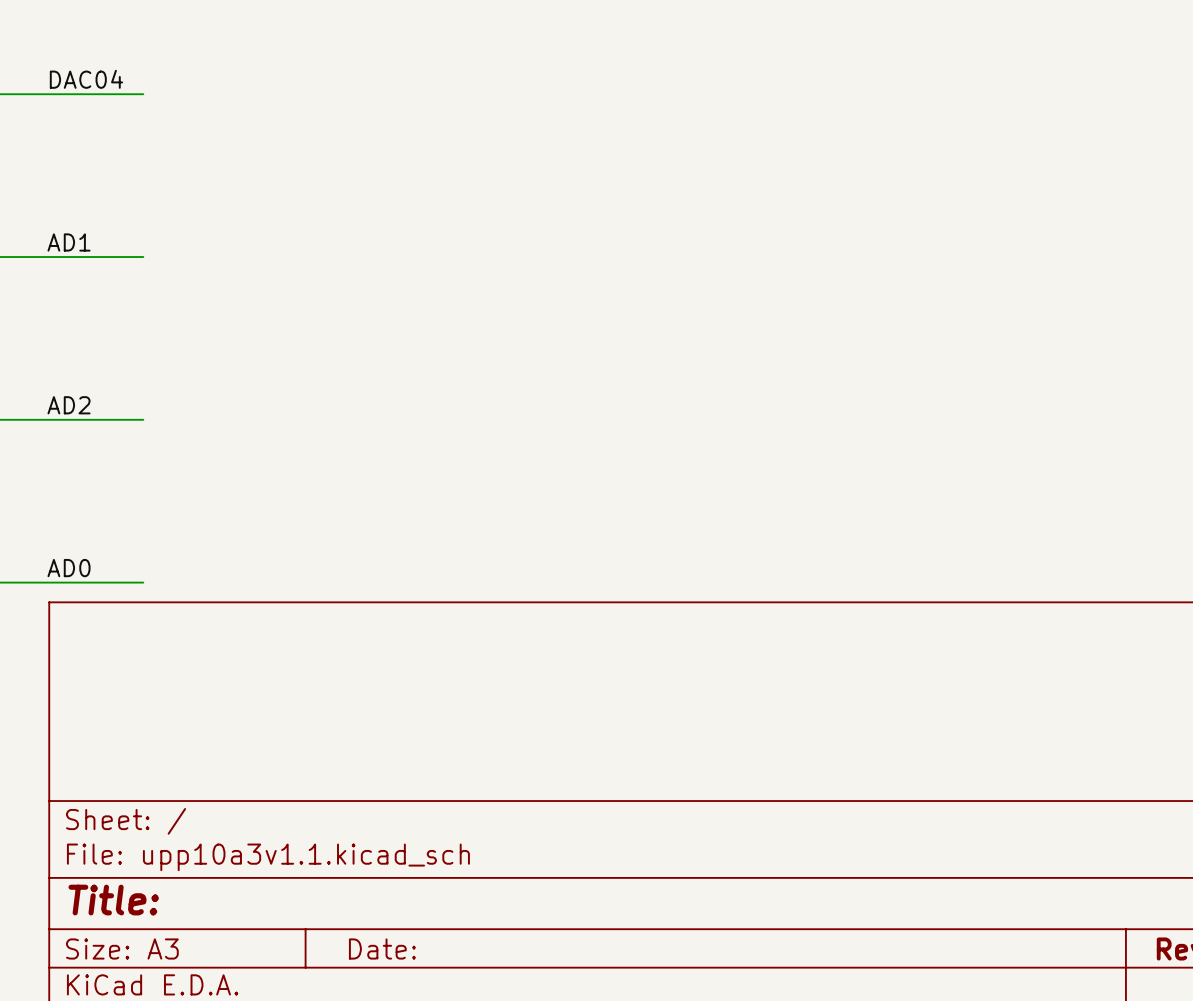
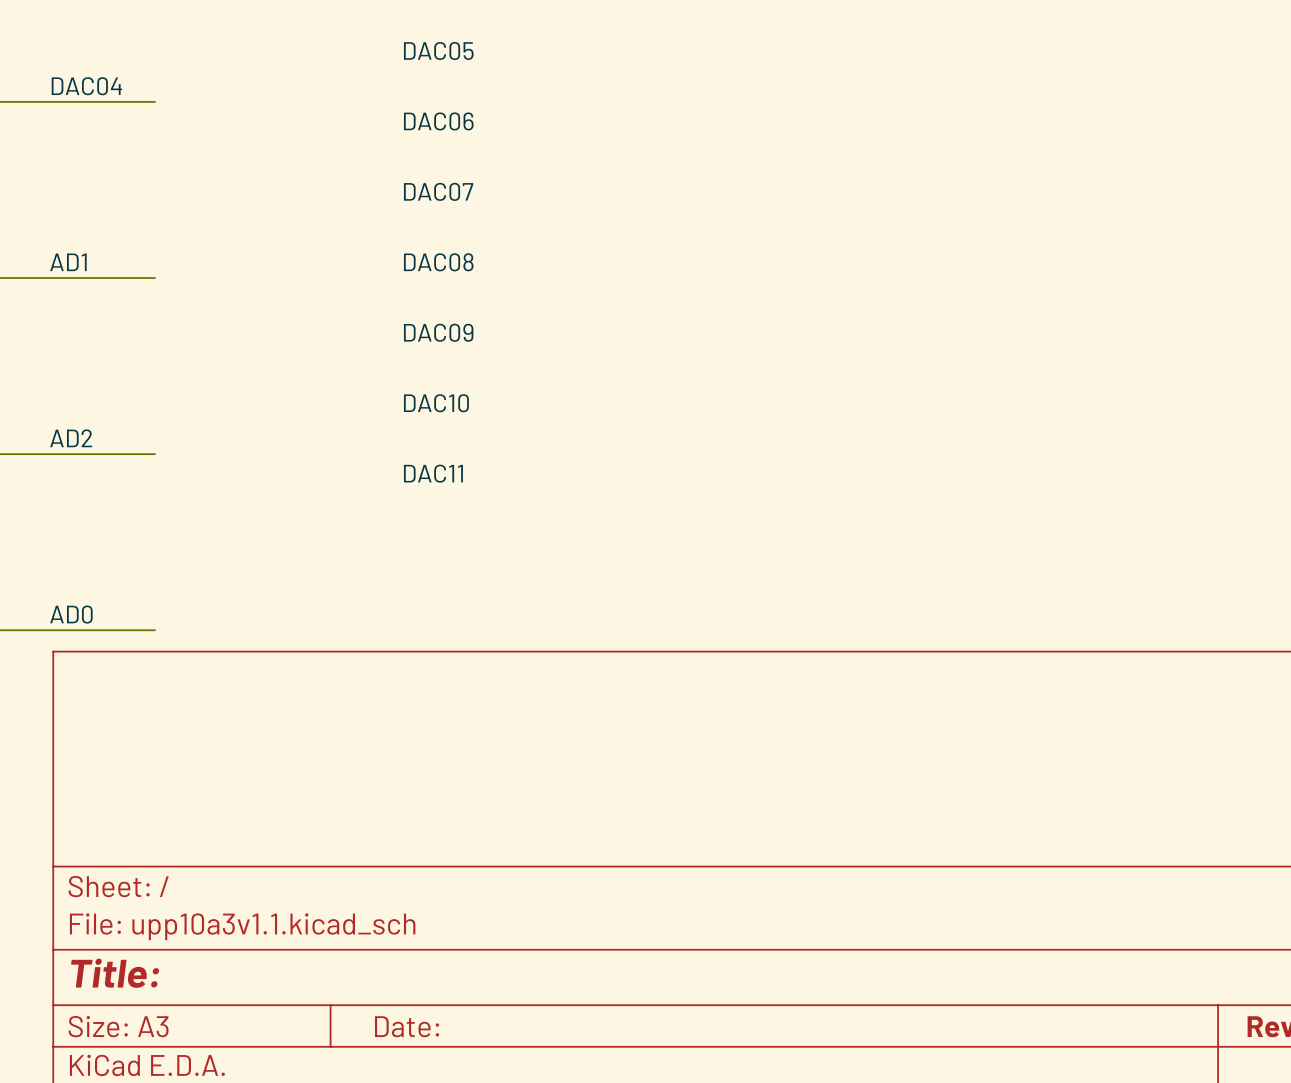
label: none -> DAC05 (438, 51)
label: none -> DAC06 (438, 121)
label: none -> DAC07 (438, 191)
label: none -> DAC08 (438, 262)
label: none -> DAC09 (438, 332)
label: none -> DAC10 (436, 403)
label: none -> DAC11 (433, 473)

